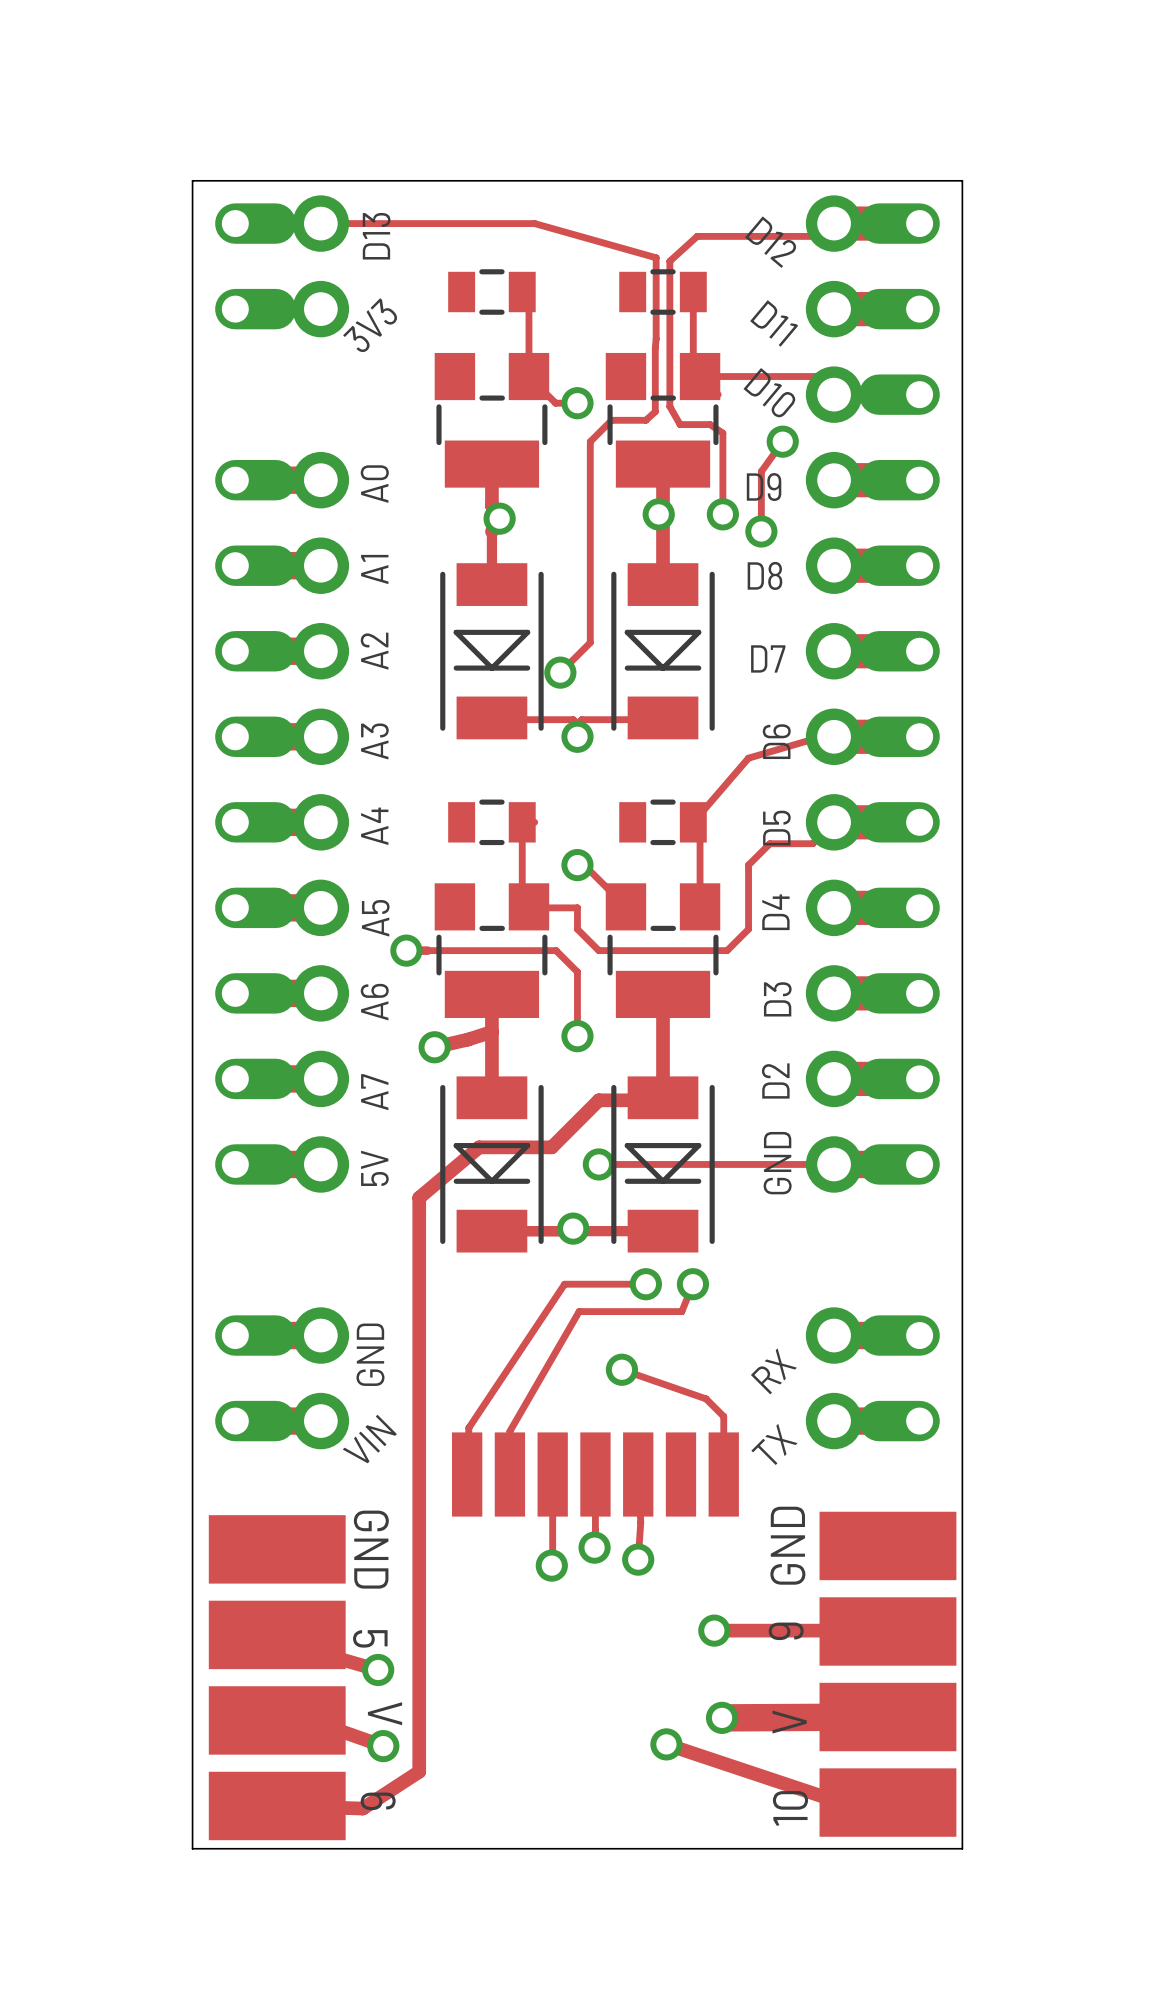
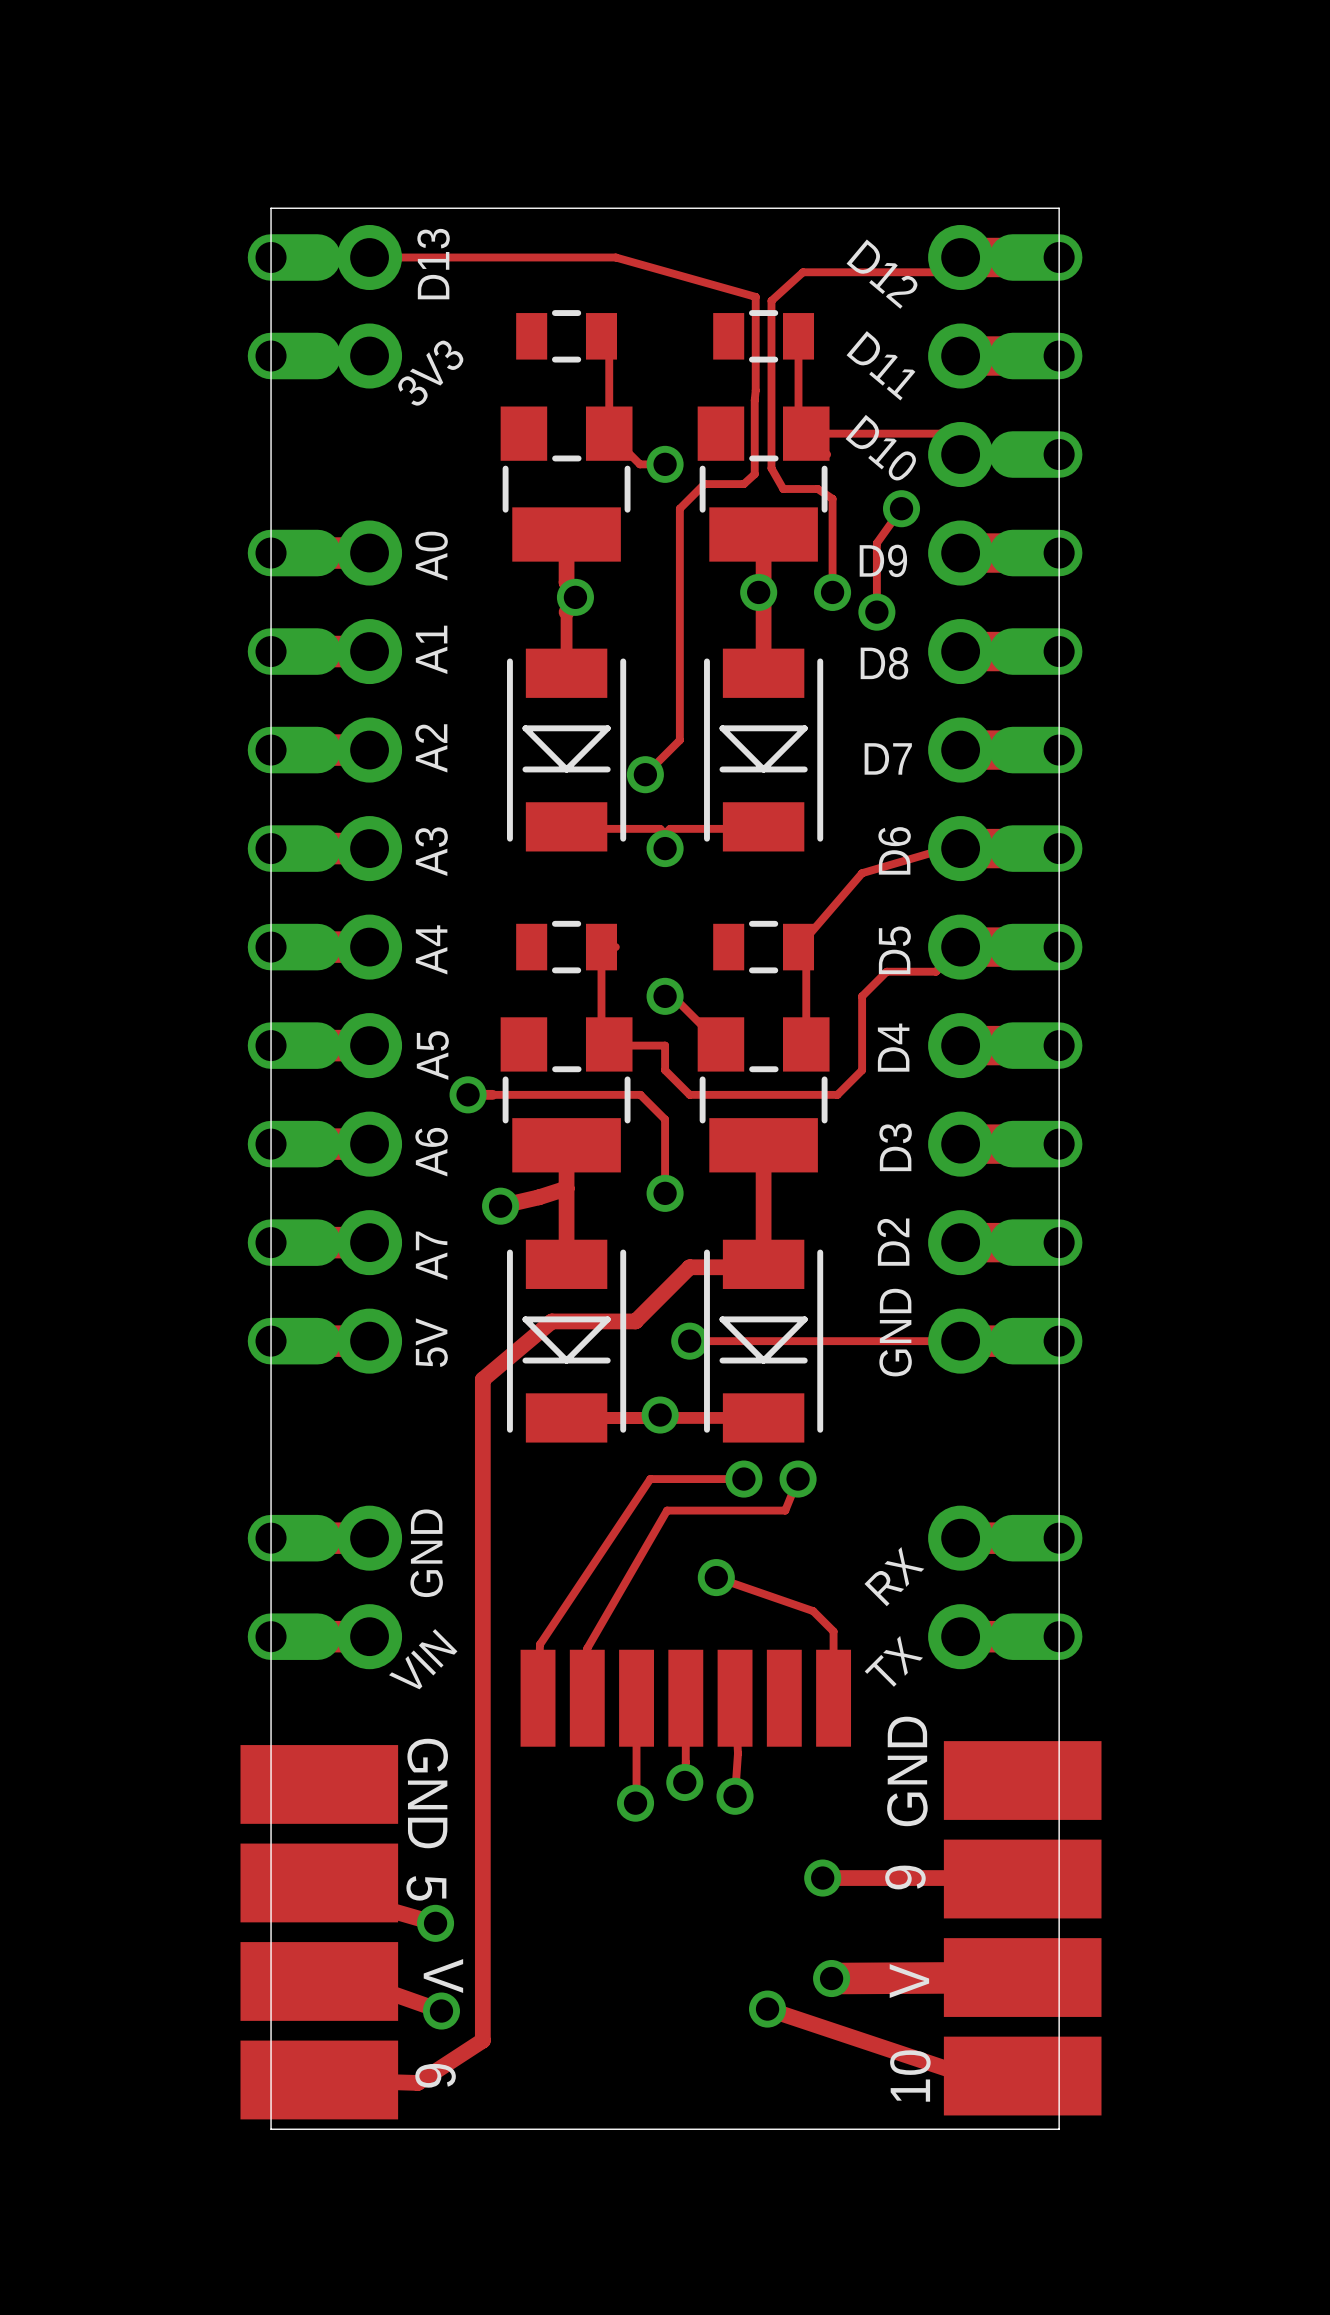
board edge: (235, 180) (192, 180) (192, 1848) (235, 1848) -> (271, 208) (271, 2129)
board edge: (919, 180) (962, 180) (962, 1848) (919, 1848) -> (1059, 208) (1059, 2129)

